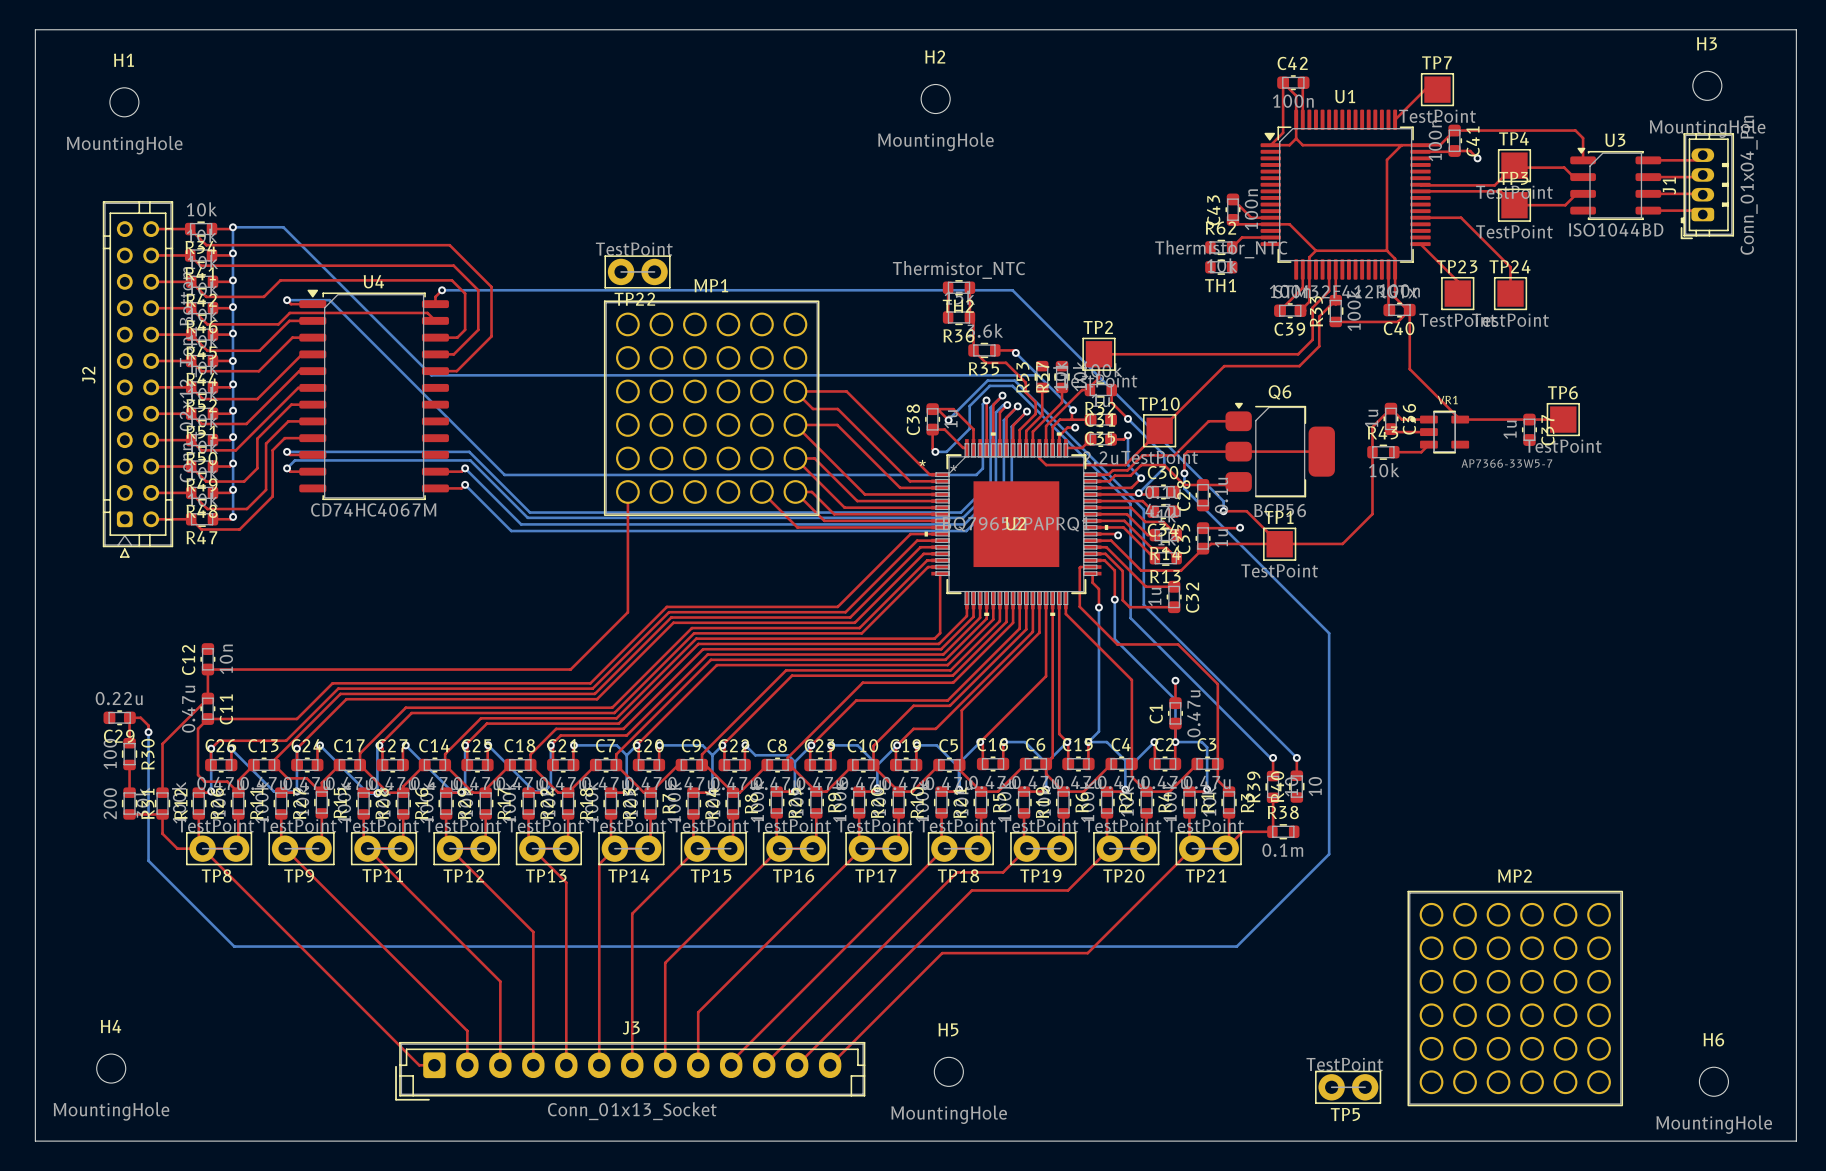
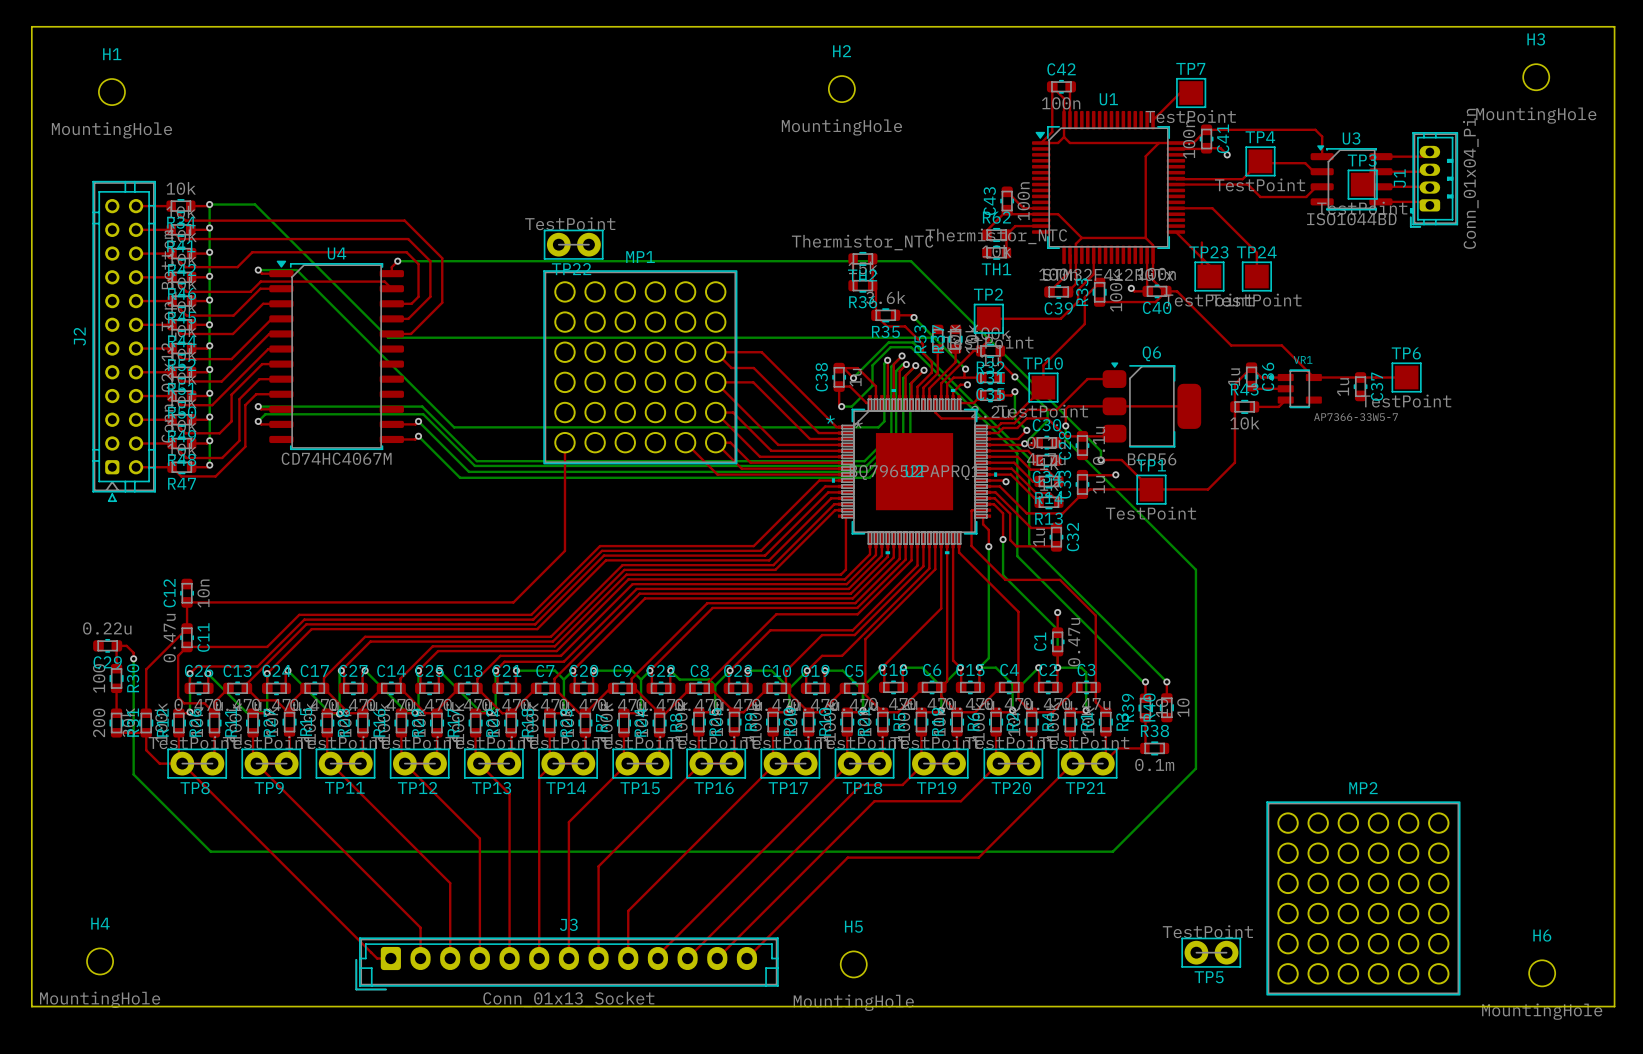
board edge: (1794, 29) (1796, 29) (1796, 1141) (35, 1141) (35, 1118) -> (1614, 26) (1614, 1006) (31, 1006)
C42 position: (1293, 82) -> (1061, 86)
top track: (1303, 82) (1302, 119) -> (1070, 86) (1069, 120)
top track: (1438, 88) (1425, 89) (1395, 119) -> (1192, 92) (1180, 93) (1153, 120)
TP7 position: (1437, 89) -> (1191, 93)
top track: (1296, 138) (1296, 95) (1283, 82) (1283, 132) (1270, 145) (1289, 145) (1296, 138) -> (1064, 137) (1064, 98) (1052, 86) (1052, 131) (1041, 143) (1058, 143) (1064, 137)
top track: (1296, 138) (1302, 145) (1439, 145) (1454, 130) (1575, 130) (1583, 138) (1583, 160) -> (1064, 137) (1069, 143) (1193, 143) (1206, 129) (1315, 129) (1322, 136) (1322, 156)
C41 position: (1454, 140) -> (1206, 139)
top track: (1401, 145) (1386, 159) (1386, 250) -> (1158, 143) (1145, 156) (1145, 237)
top track: (1420, 151) (1470, 150) (1477, 158) -> (1175, 148) (1220, 148) (1227, 154)
top track: (1702, 155) (1697, 160) (1648, 160) -> (1429, 151) (1425, 156) (1380, 156)
via: (1477, 158) -> none
TP4 position: (1514, 165) -> (1260, 161)
via: none -> (1227, 154)
top track: (1702, 174) (1700, 177) (1648, 177) -> (1429, 169) (1427, 171) (1380, 171)
top track: (1583, 177) (1573, 176) (1564, 167) (1516, 167) (1514, 165) (1494, 185) (1420, 184) -> (1322, 171) (1313, 171) (1305, 163) (1262, 163) (1260, 161) (1242, 179) (1175, 178)
U3 position: (1615, 183) -> (1351, 177)
J1 position: (1707, 186) -> (1434, 179)
top track: (1420, 191) (1500, 191) (1514, 205) (1565, 205) (1576, 193) (1583, 193) -> (1175, 184) (1248, 184) (1260, 197) (1306, 197) (1316, 186) (1322, 186)
top track: (1648, 193) (1702, 194) -> (1380, 186) (1429, 187)
U1 position: (1345, 194) -> (1108, 187)
top track: (1232, 199) (1251, 217) (1270, 217) -> (1007, 191) (1023, 208) (1041, 208)
C43 position: (1232, 209) -> (1007, 201)
top track: (1648, 210) (1698, 210) (1702, 214) -> (1380, 201) (1426, 201) (1429, 205)
top track: (1420, 217) (1461, 217) (1510, 267) (1510, 293) -> (1175, 208) (1212, 208) (1256, 252) (1256, 276)
top track: (1232, 219) (1237, 224) (1289, 224) (1315, 250) -> none
top track: (1270, 237) (1242, 237) (1232, 247) -> none
top track: (1420, 244) (1457, 281) (1457, 293) -> (1175, 232) (1209, 265) (1209, 276)
R62 position: (1221, 247) -> (996, 234)
top track: (1315, 250) (1386, 250) -> (1081, 237) (1145, 237)
top track: (1315, 250) (1309, 257) (1309, 301) (1300, 310) (1305, 310) -> (1081, 237) (1075, 243) (1075, 283) (1067, 291) (1072, 291)
top track: (1386, 250) (1395, 258) (1395, 297) (1409, 310) -> none
top track: none -> (1041, 226) (1015, 226) (1006, 234) (1006, 252)
top track: none -> (986, 234) (986, 230) (1007, 210) (1011, 214) (1058, 214) (1081, 237)
TH1 position: (1221, 267) -> (996, 252)
top track: (1302, 269) (1302, 287) (1280, 310) -> none
top track: (1329, 269) (1329, 291) (1312, 307) (1312, 339) (1298, 354) (1179, 354) -> (1093, 254) (1093, 274) (1078, 289) (1078, 301) (1060, 318)
top track: (1388, 269) (1389, 310) -> none
top track: none -> (1069, 254) (1070, 270) (1049, 291)
top track: none -> (1147, 254) (1147, 291) (1134, 291) (1131, 288)
TP23 position: (1457, 293) -> (1209, 276)
TP24 position: (1510, 293) -> (1256, 276)
top track: (1335, 300) (1319, 316) (1319, 346) (1299, 366) (1224, 366) (1159, 430) -> (1099, 282) (1084, 297) (1084, 324) (1043, 365) (1043, 387)
C39 position: (1290, 310) -> (1058, 291)
C40 position: (1399, 310) -> (1157, 291)
top track: (1409, 310) (1409, 369) (1424, 383) -> (1145, 237) (1153, 245) (1153, 280) (1164, 291) (1177, 291) (1231, 345) (1281, 345)
top track: (1409, 310) (1397, 321) (1335, 321) -> (1166, 291) (1155, 302) (1099, 302)
R33 position: (1335, 311) -> (1099, 292)
via: none -> (1131, 288)
C37 position: (1529, 429) -> (1360, 386)
TP5 position: (1348, 1087) -> (1211, 952)

